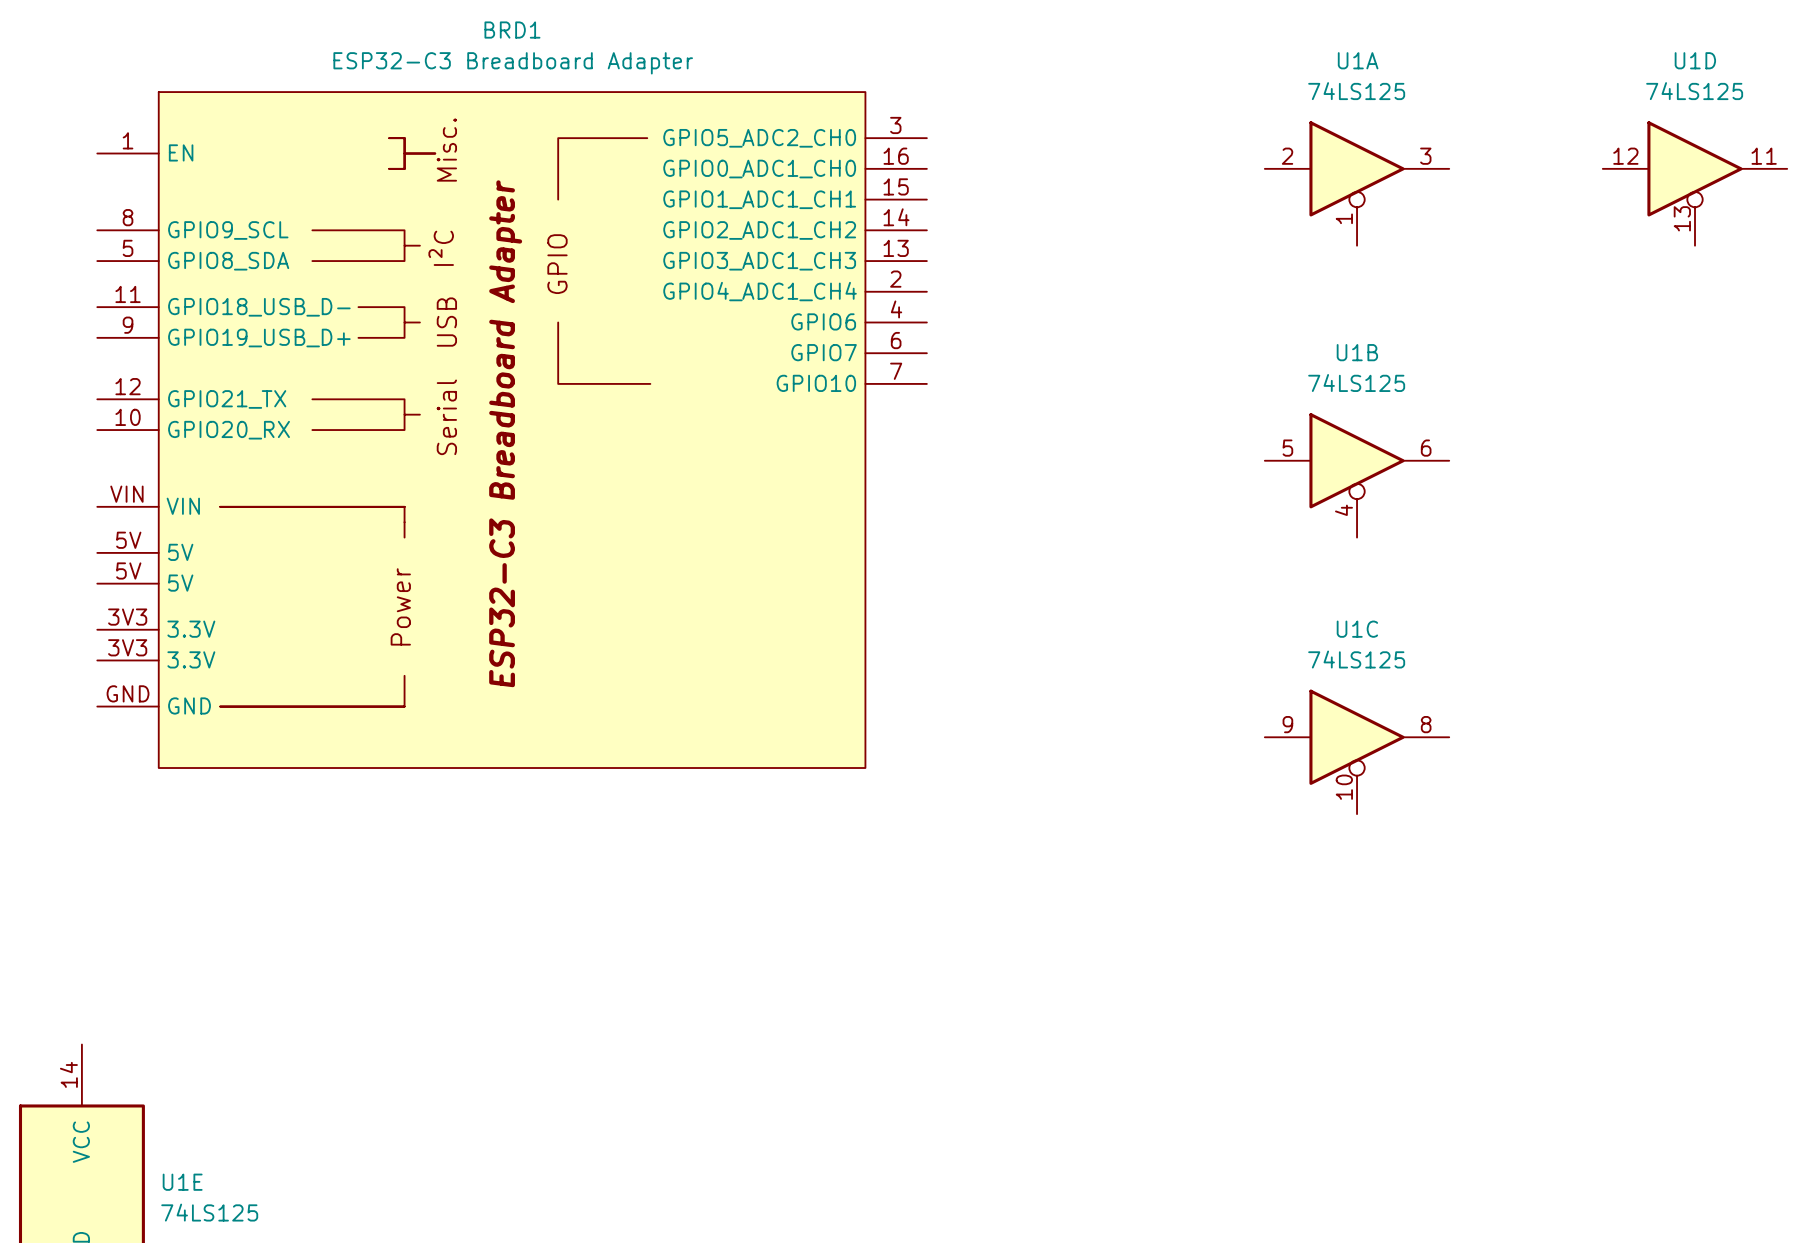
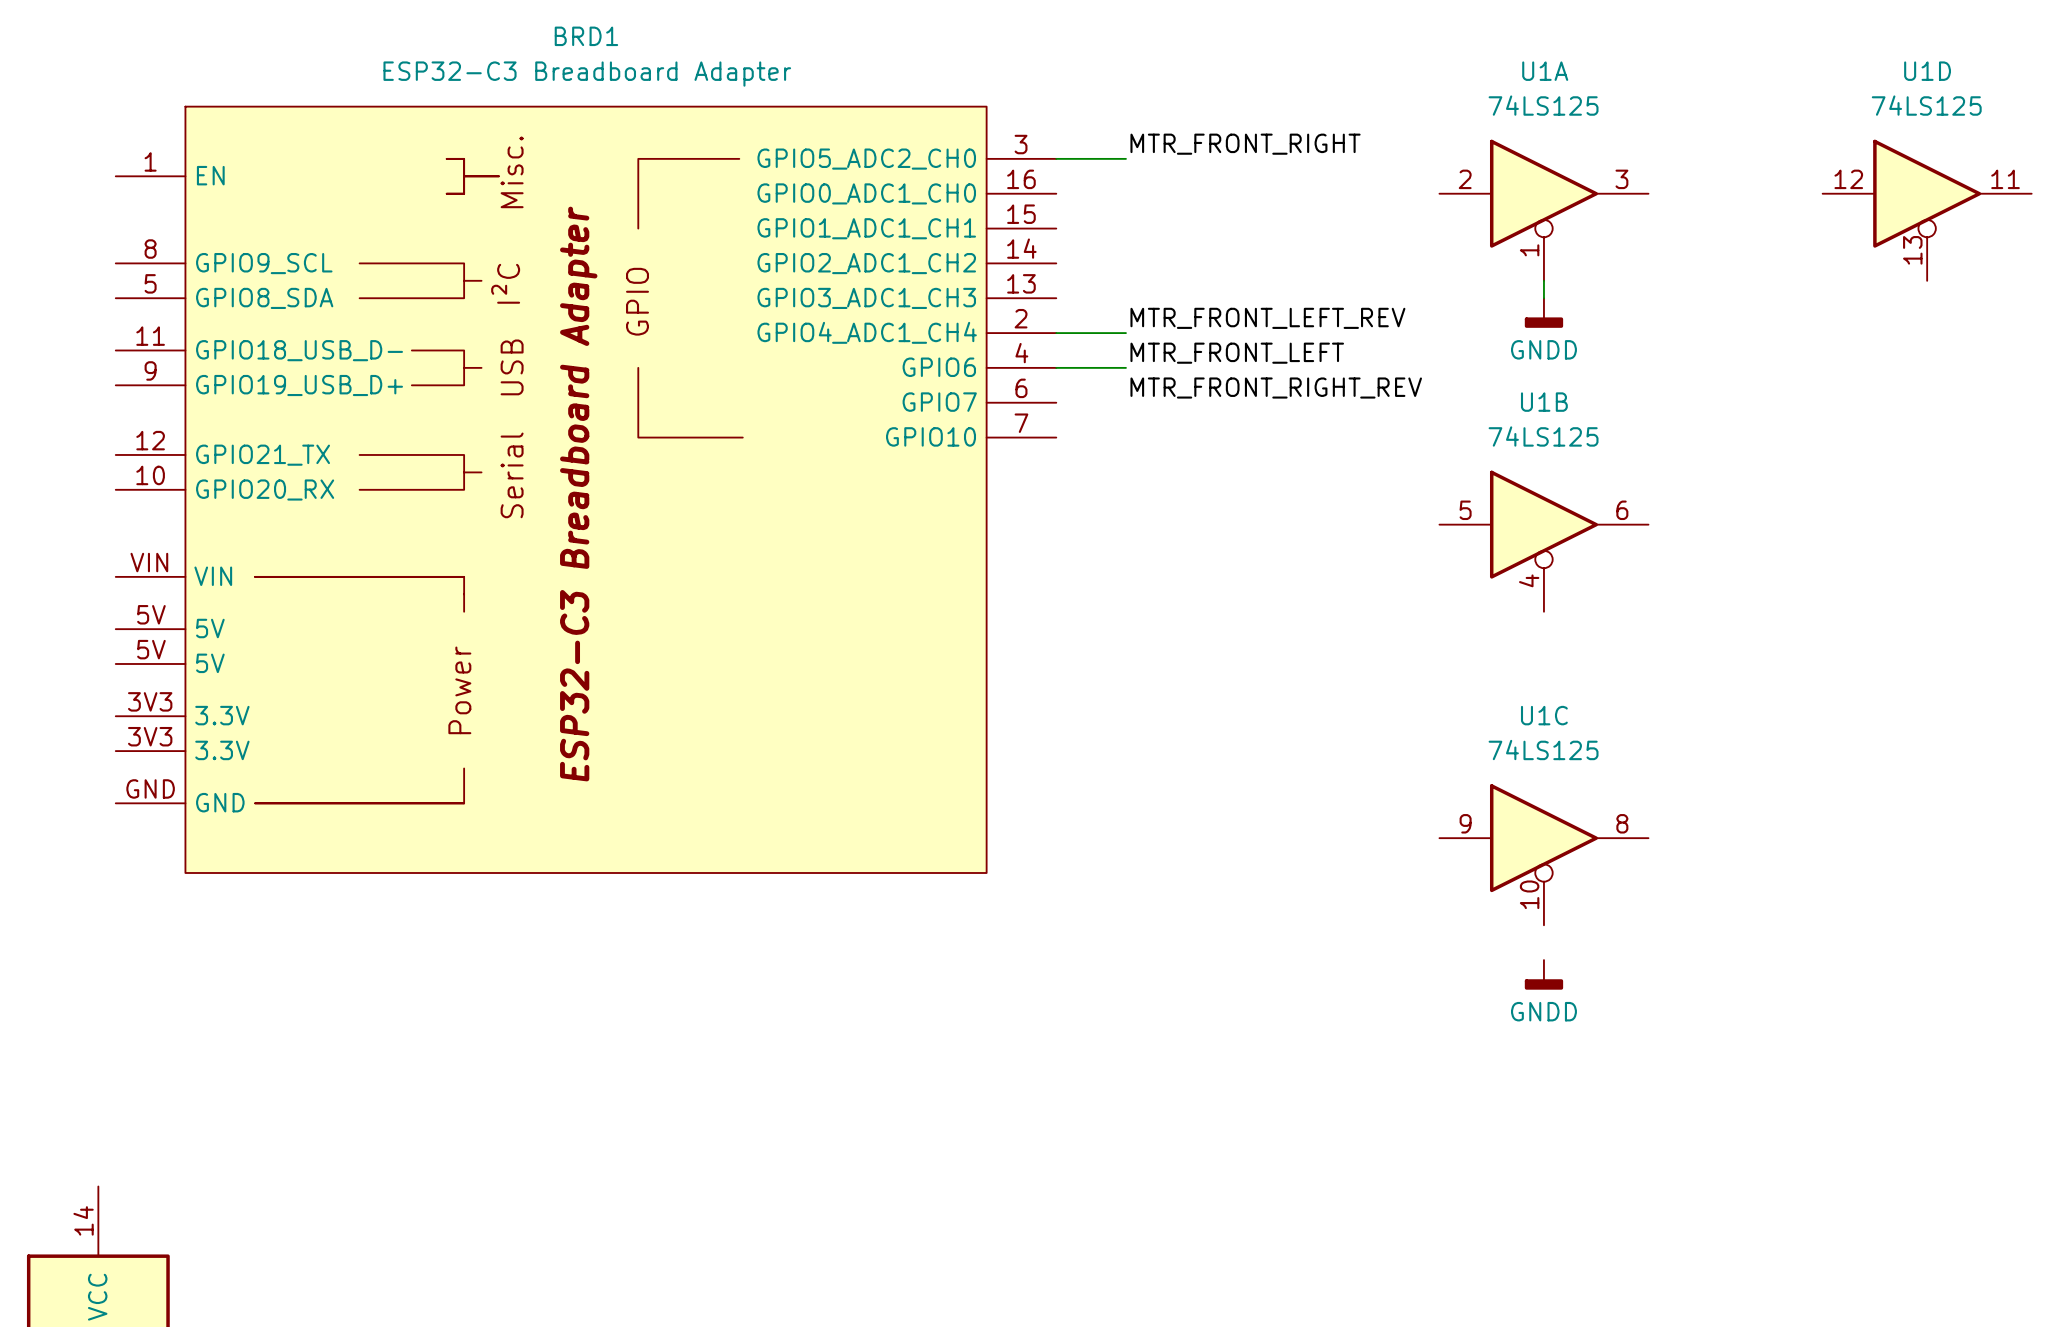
label: none -> MTR_FRONT_RIGHT (1245, 144)
wire: none -> (1056, 158) (1125, 158)
wire: none -> (1543, 280) (1543, 298)
power symbol: none -> GNDD (1543, 313)
label: none -> MTR_FRONT_LEFT_REV (1267, 318)
wire: none -> (1056, 333) (1125, 333)
label: none -> MTR_FRONT_LEFT (1237, 353)
wire: none -> (1056, 367) (1125, 367)
label: none -> MTR_FRONT_RIGHT_REV (1276, 388)
power symbol: none -> GNDD (1543, 974)

